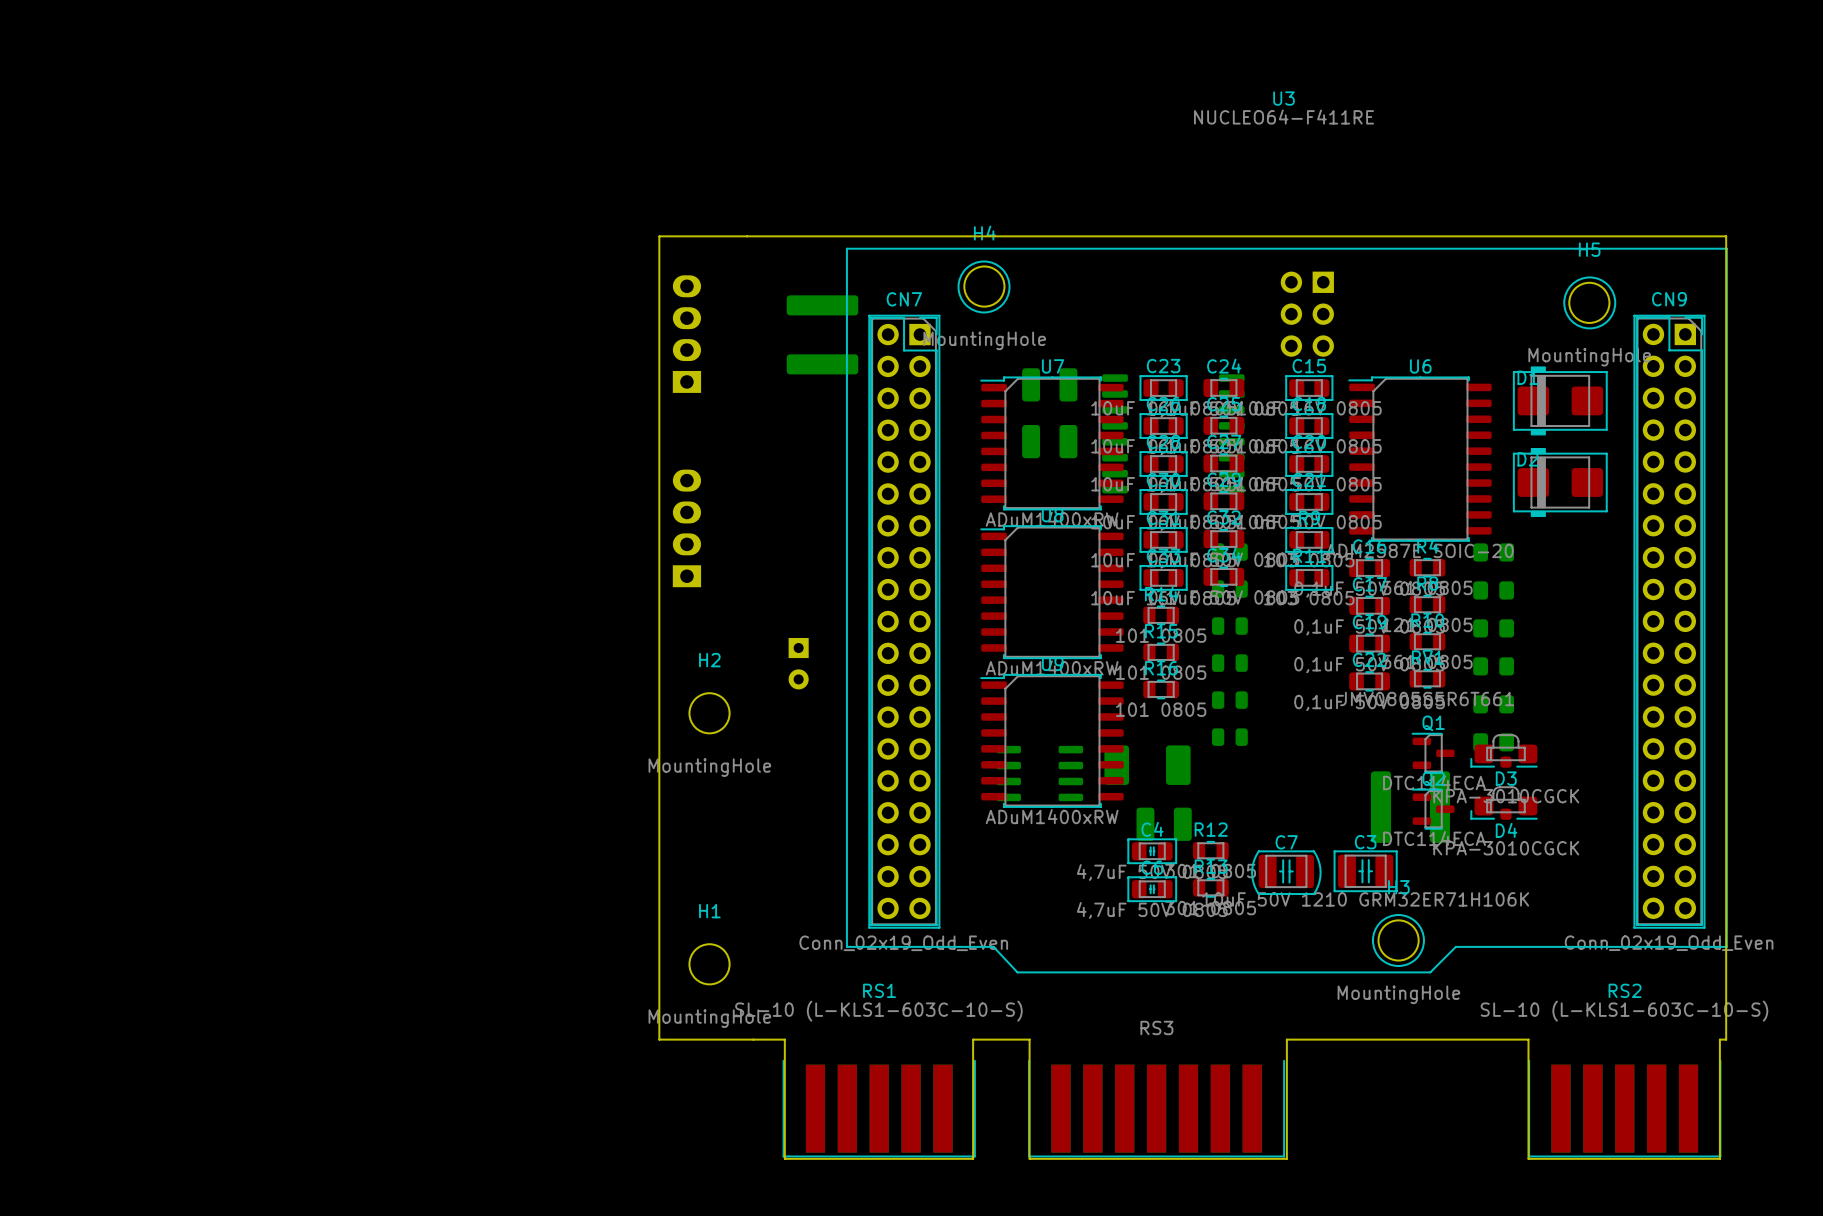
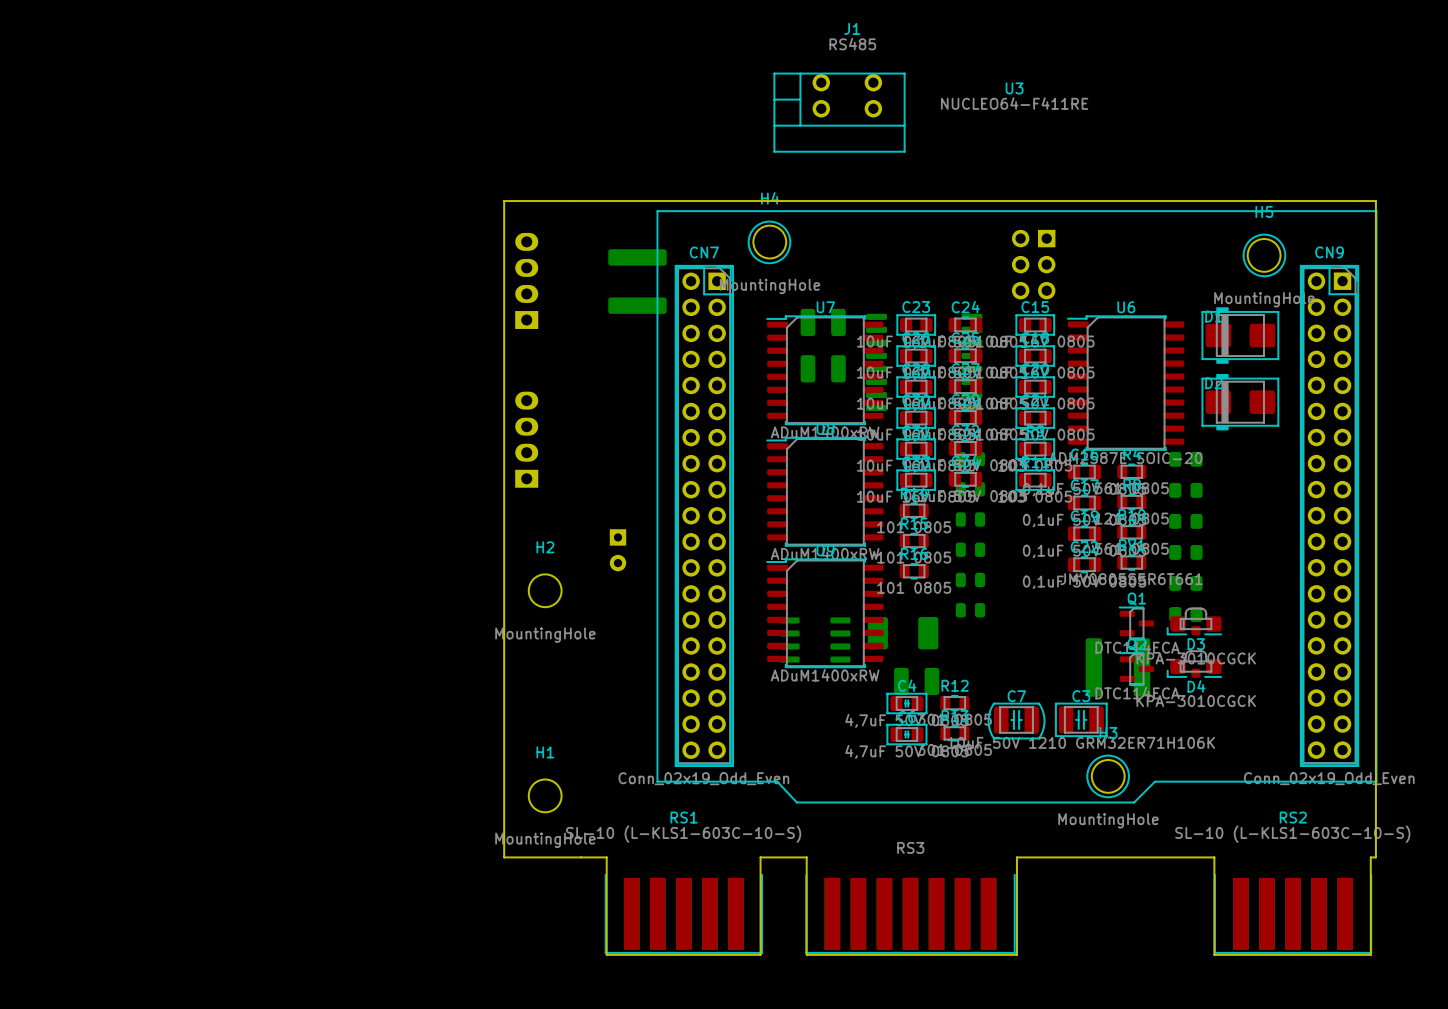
J1: none -> RS485 (839, 112)

